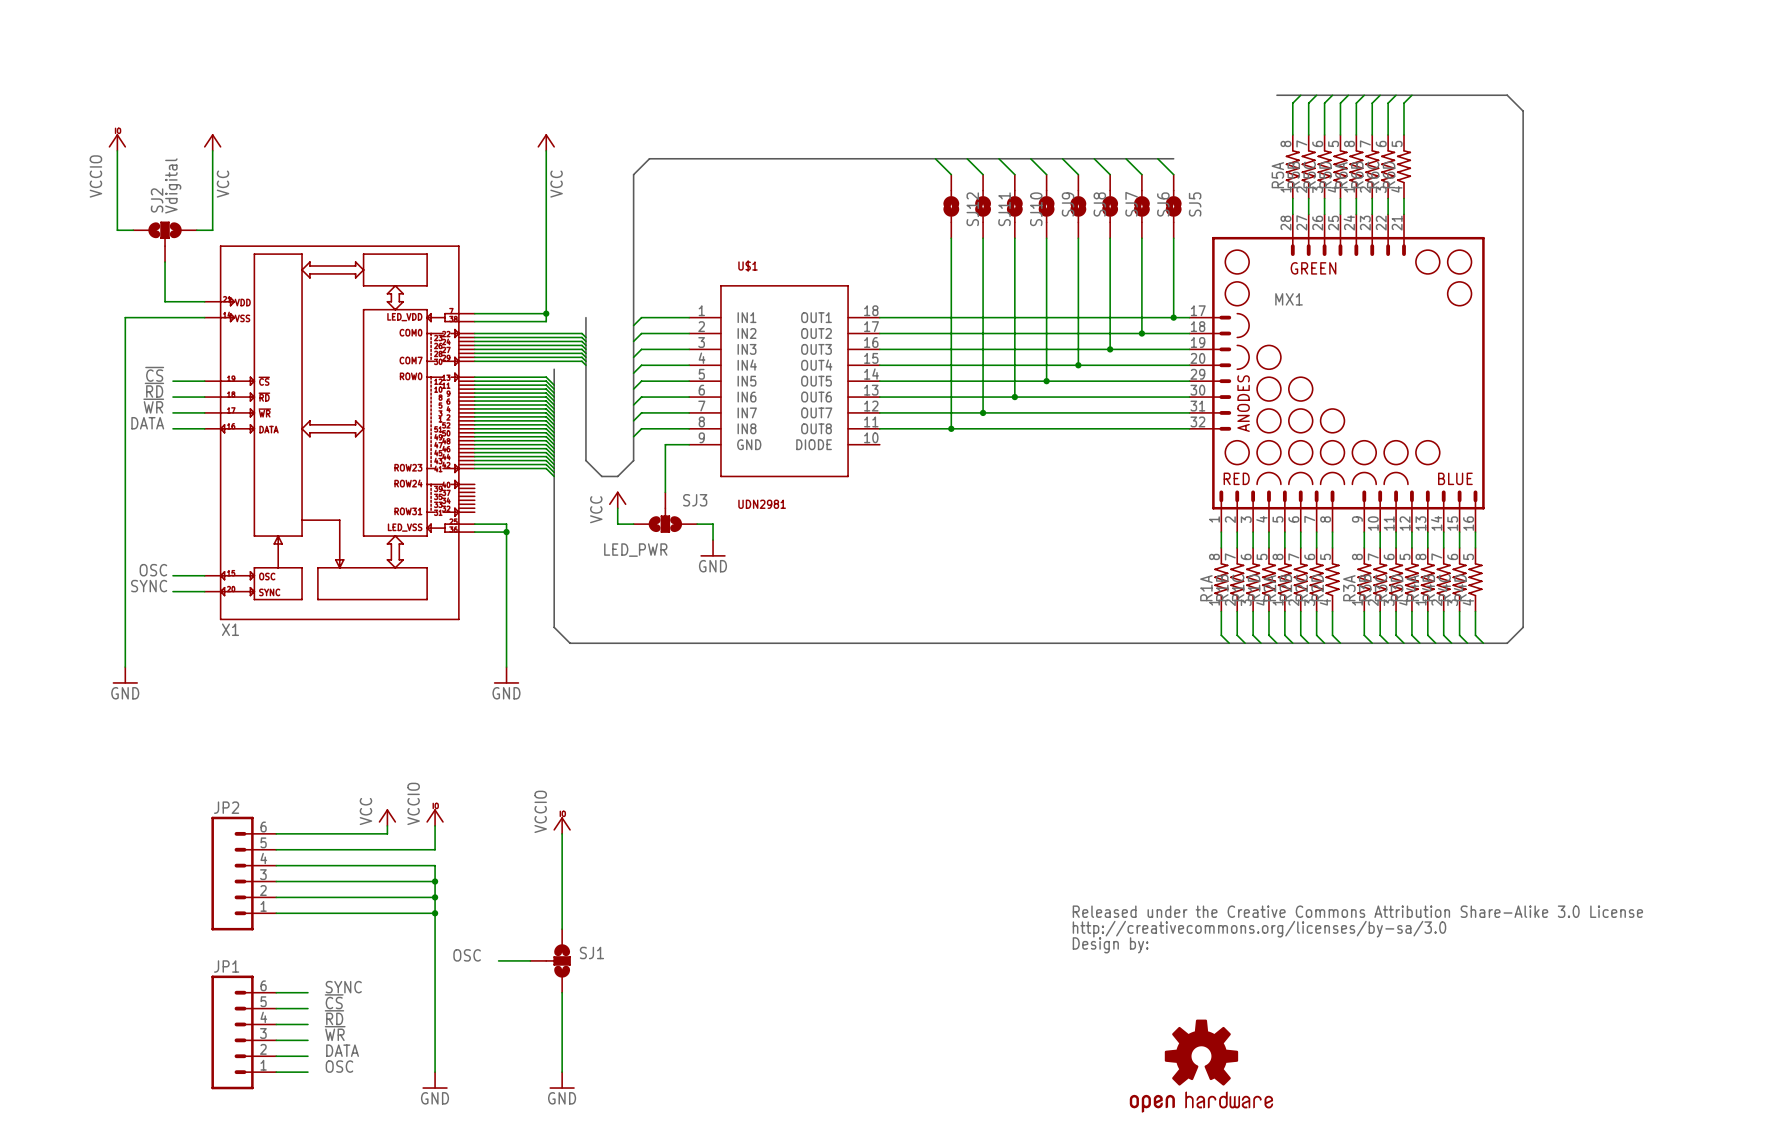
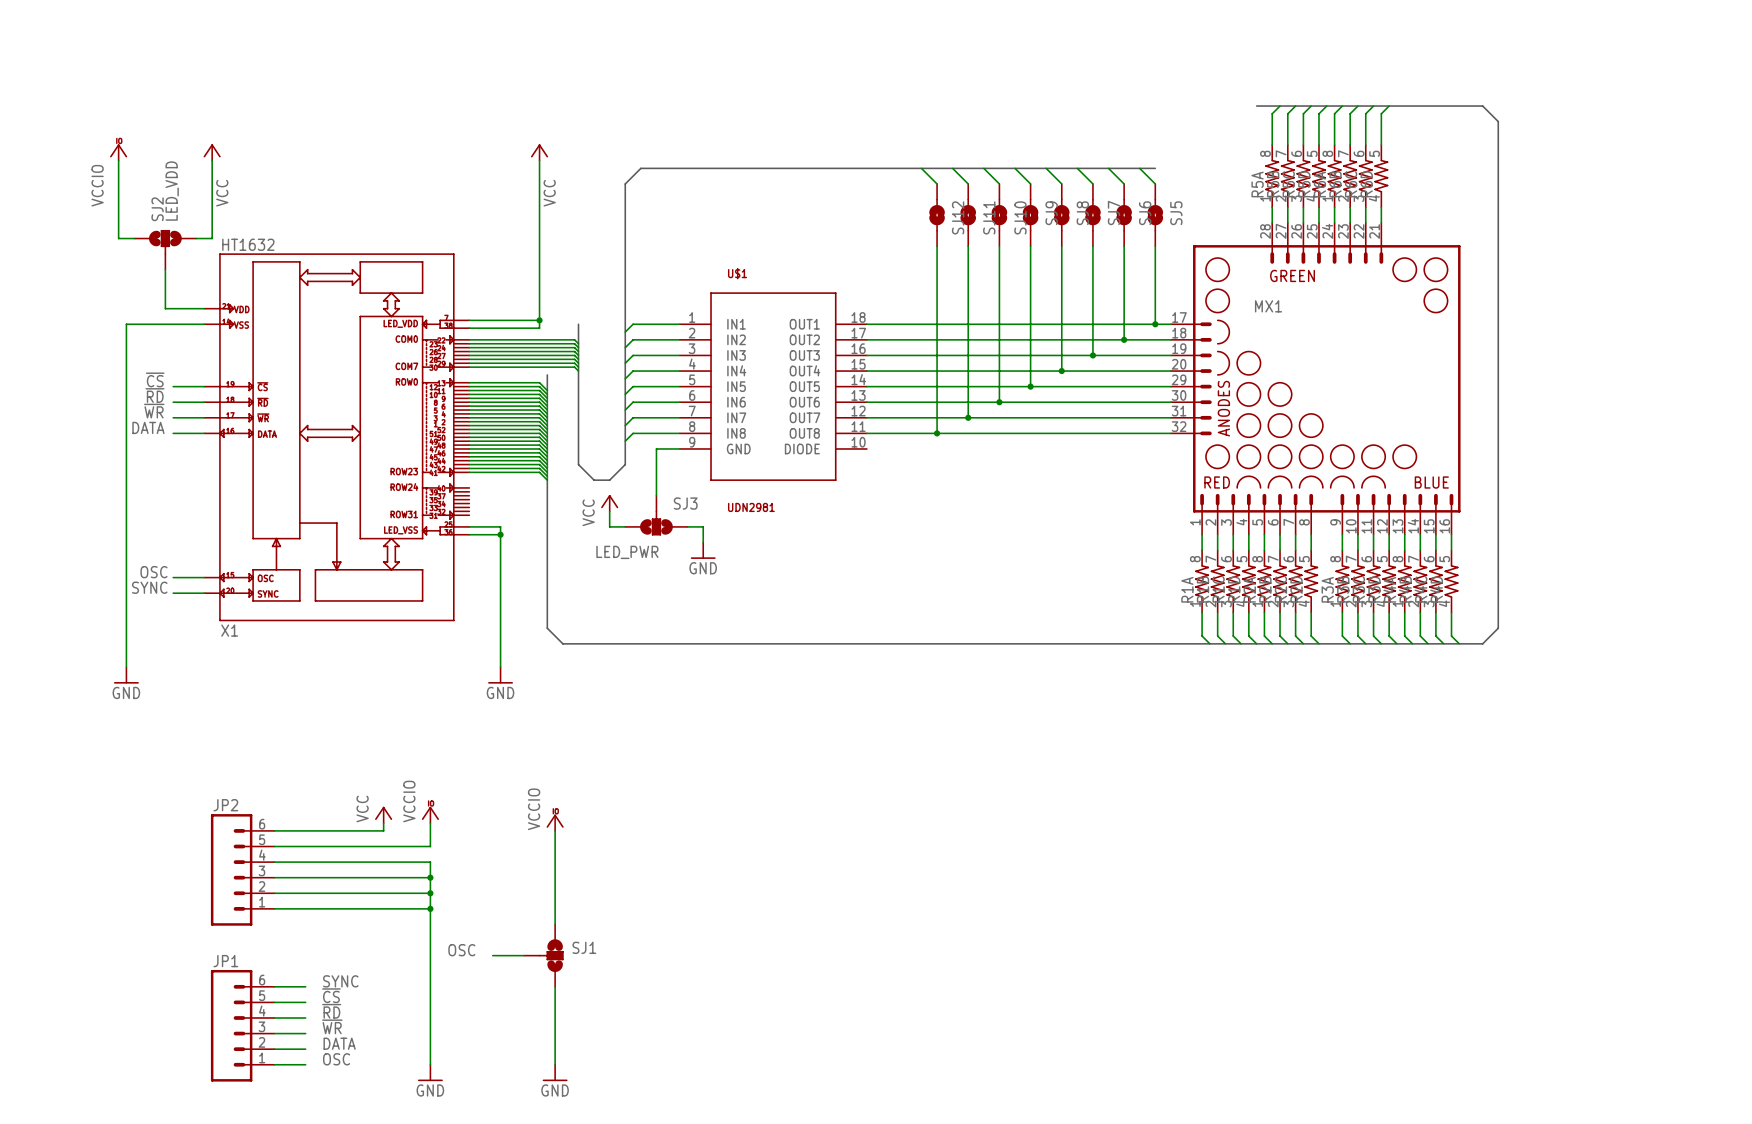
SJ2 value: Vdigital (173, 185) -> LED_VDD (172, 191)
X1 text: none -> HT1632 (248, 244)
part: (1357, 929) -> none
part: (1201, 1066) -> none

